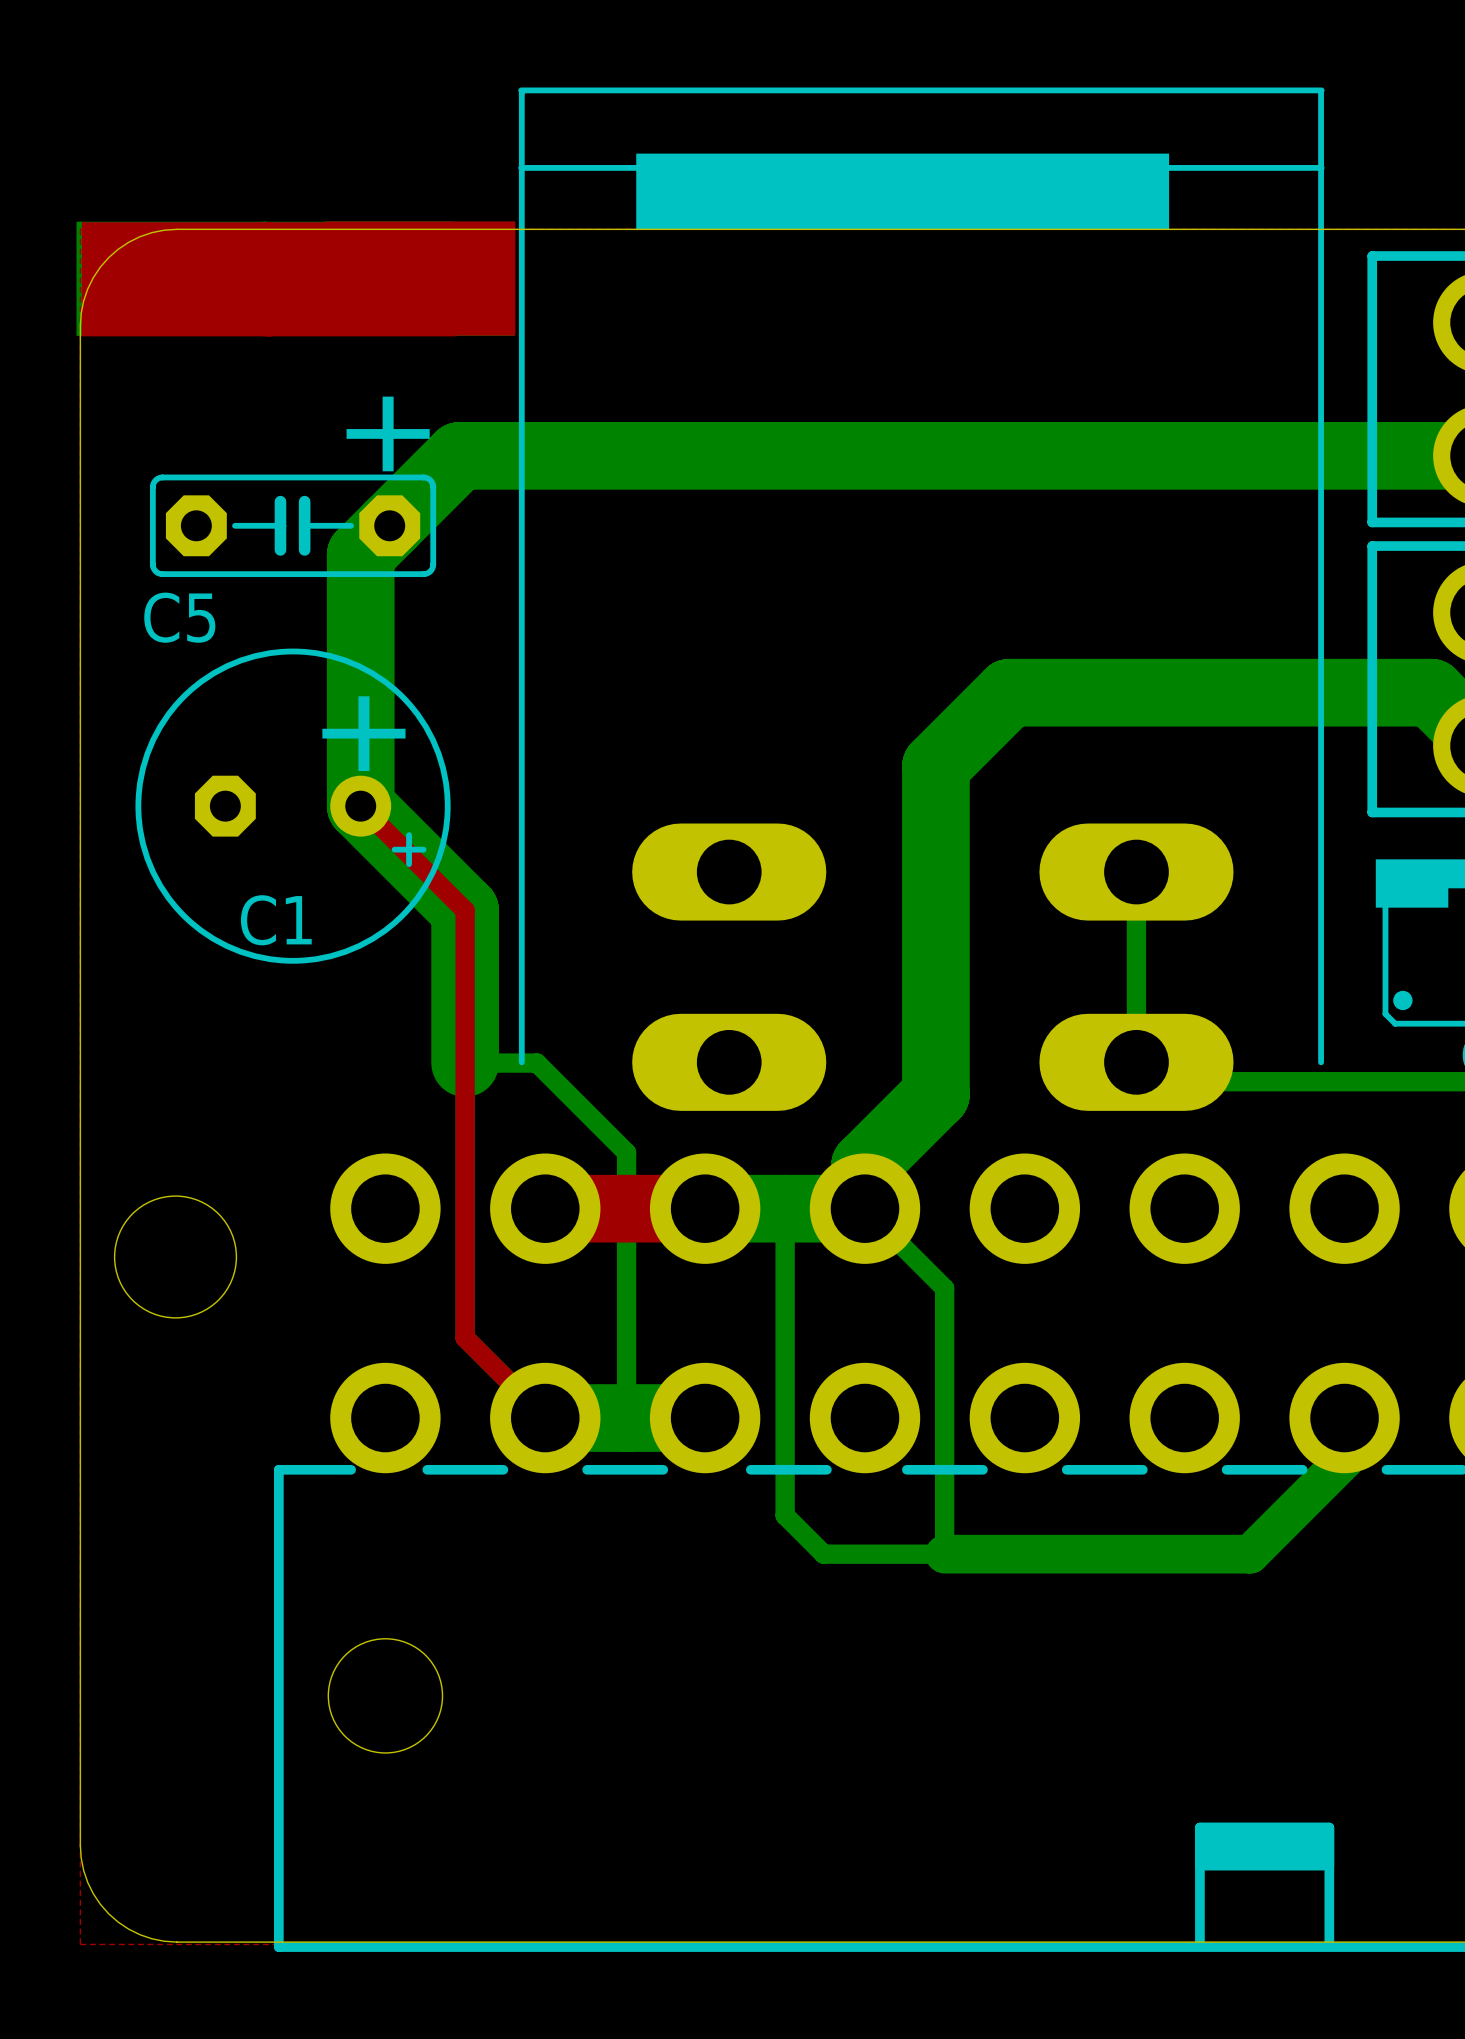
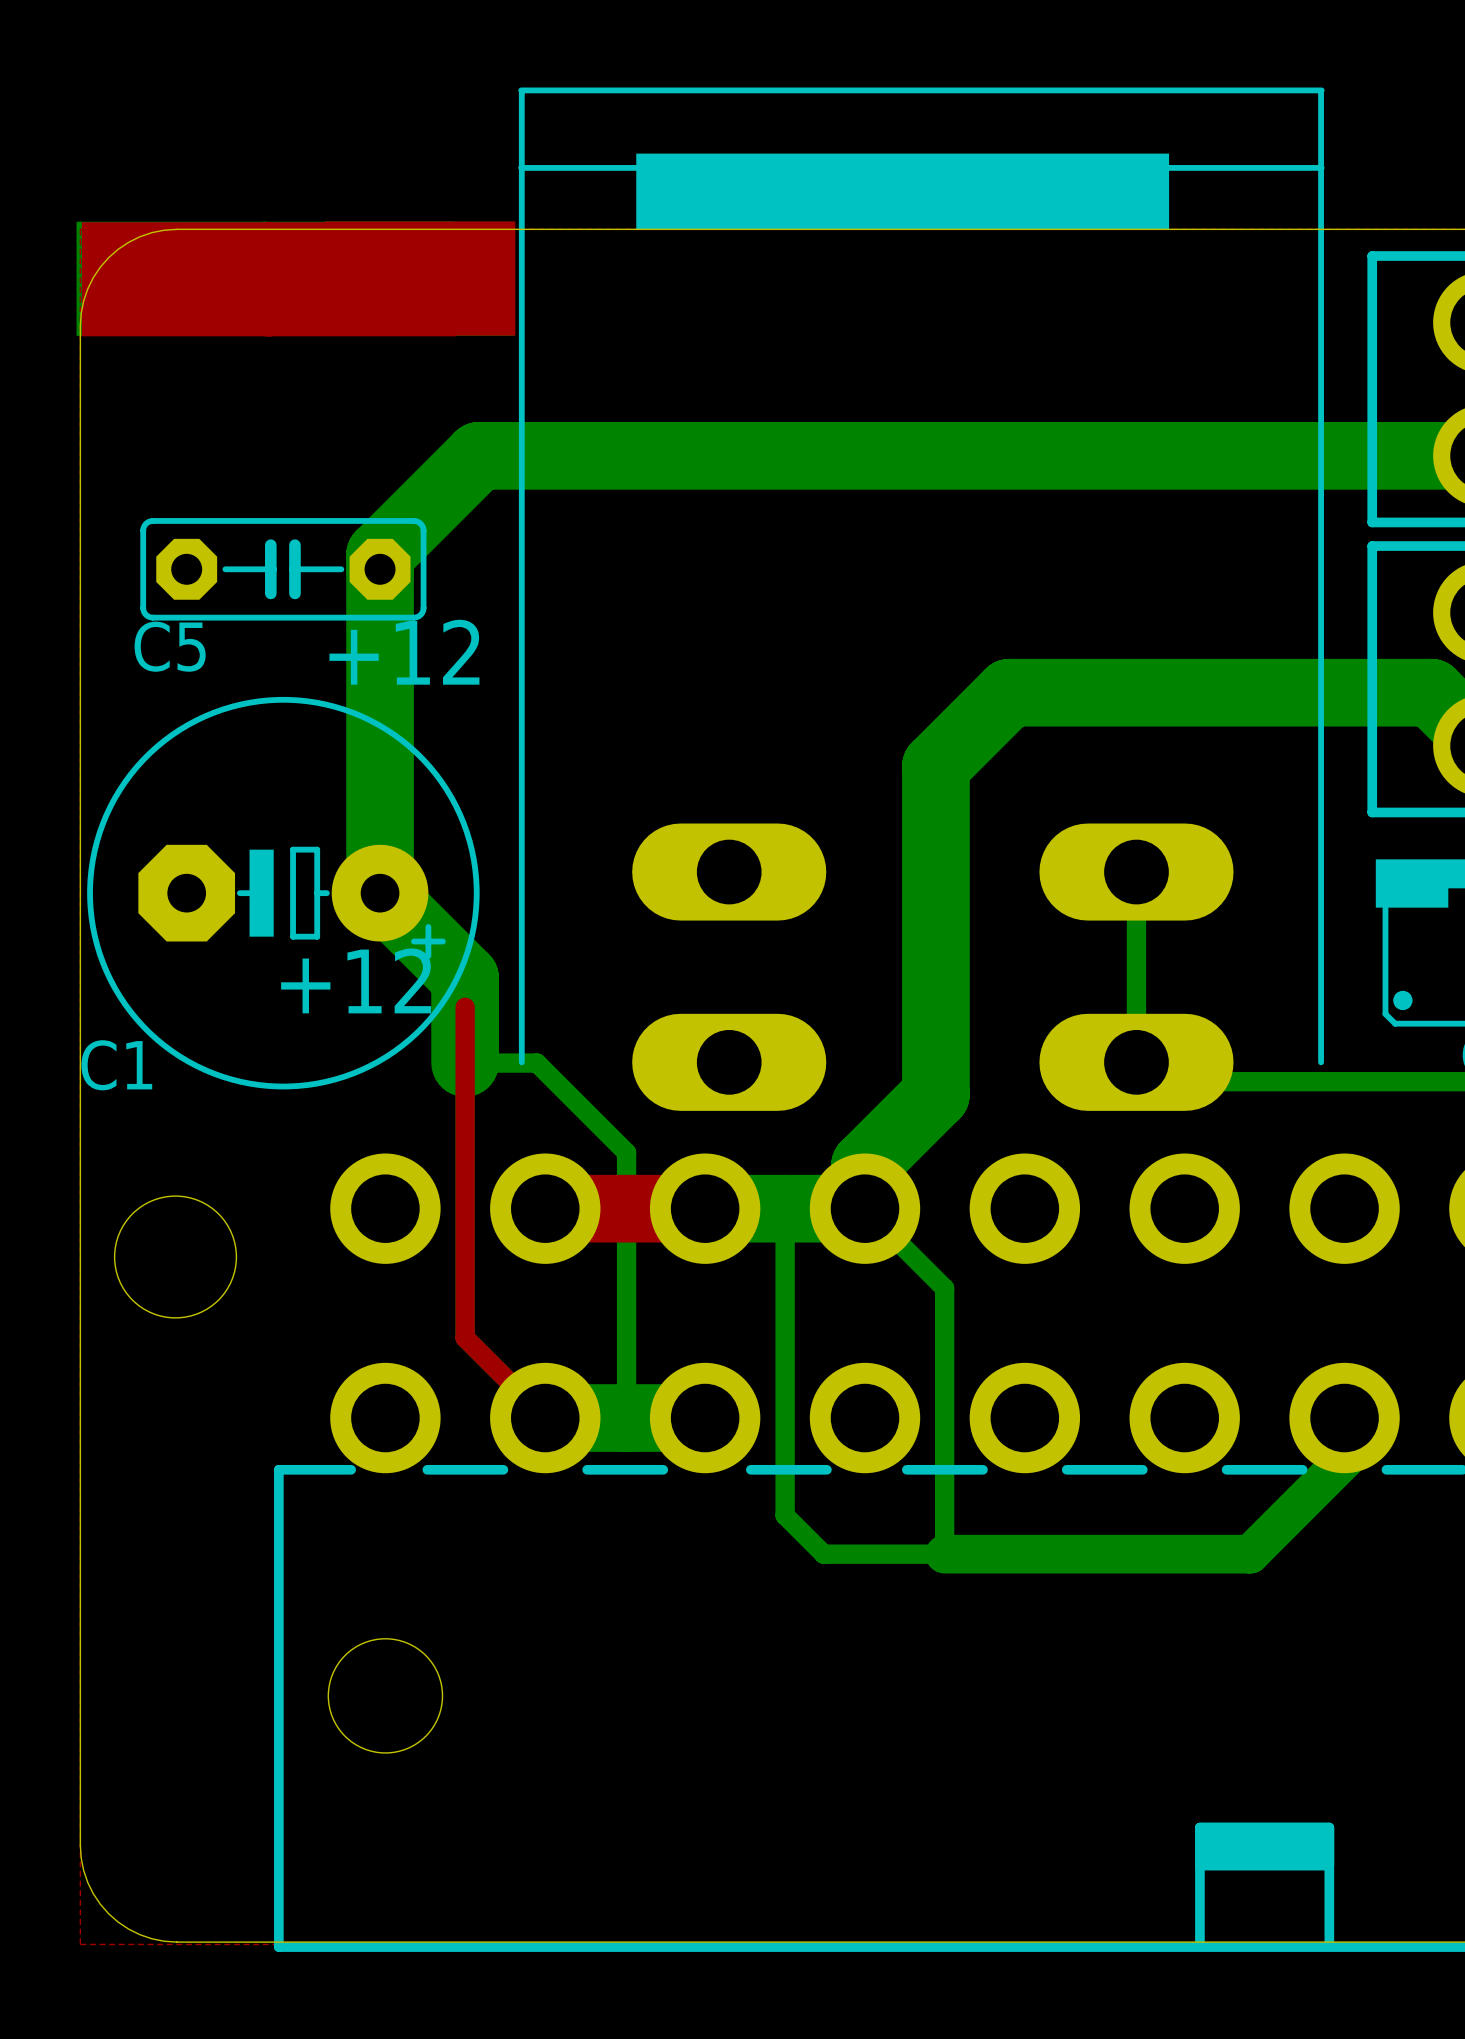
text: + (388, 433) -> none
bottom track: (479, 455) (459, 455) (360, 554) (360, 806) (465, 910) (465, 978) -> (479, 455) (380, 554) (380, 893) (465, 978)
C5 position: (293, 525) -> (283, 569)
C5 name position: C5 (179, 617) -> C5 (170, 646)
C1 footprint: [135, 648, 451, 964] -> [87, 696, 480, 1090]
text: none -> +12 (404, 652)
text: + (363, 733) -> none
top track: (360, 806) (465, 910) (465, 1007) -> none
C1 name position: C1 (276, 920) -> C1 (116, 1065)
text: none -> +12 (356, 980)

